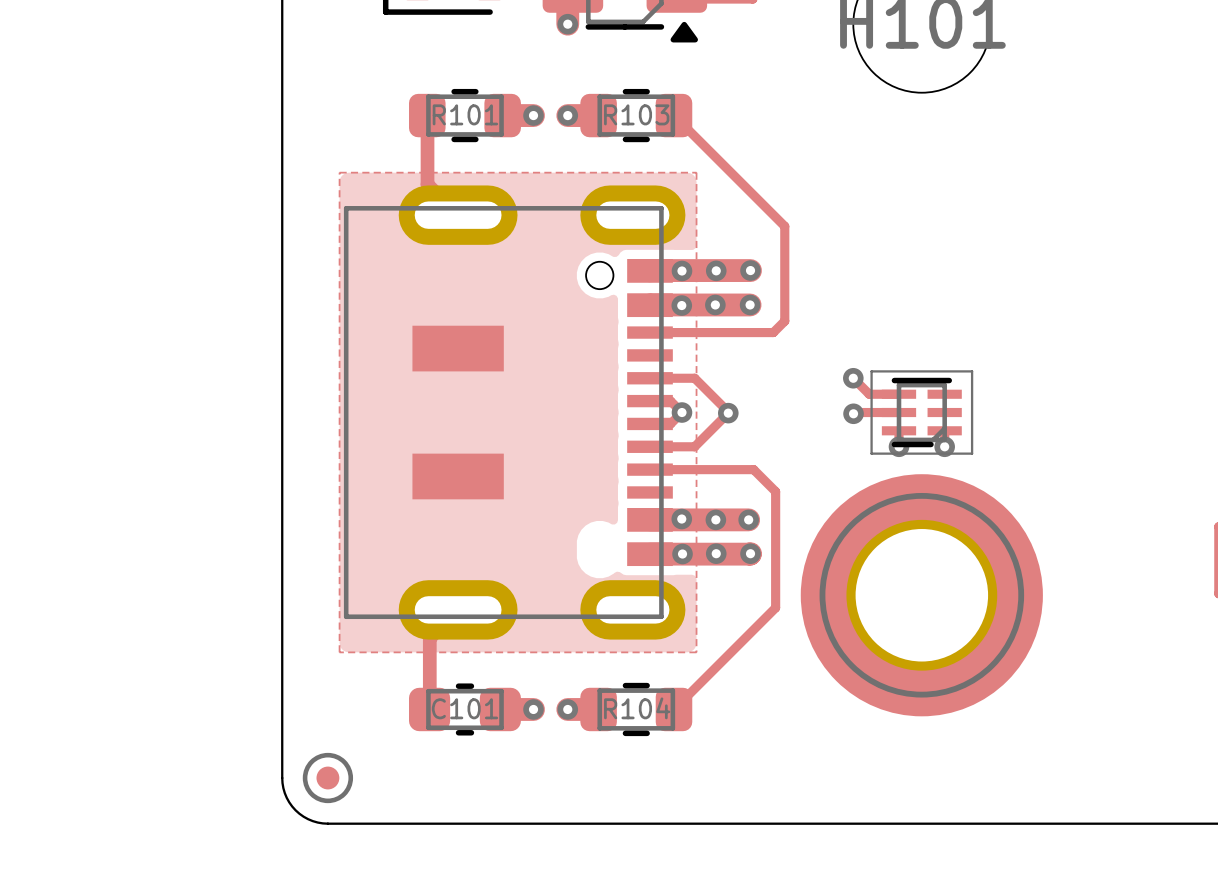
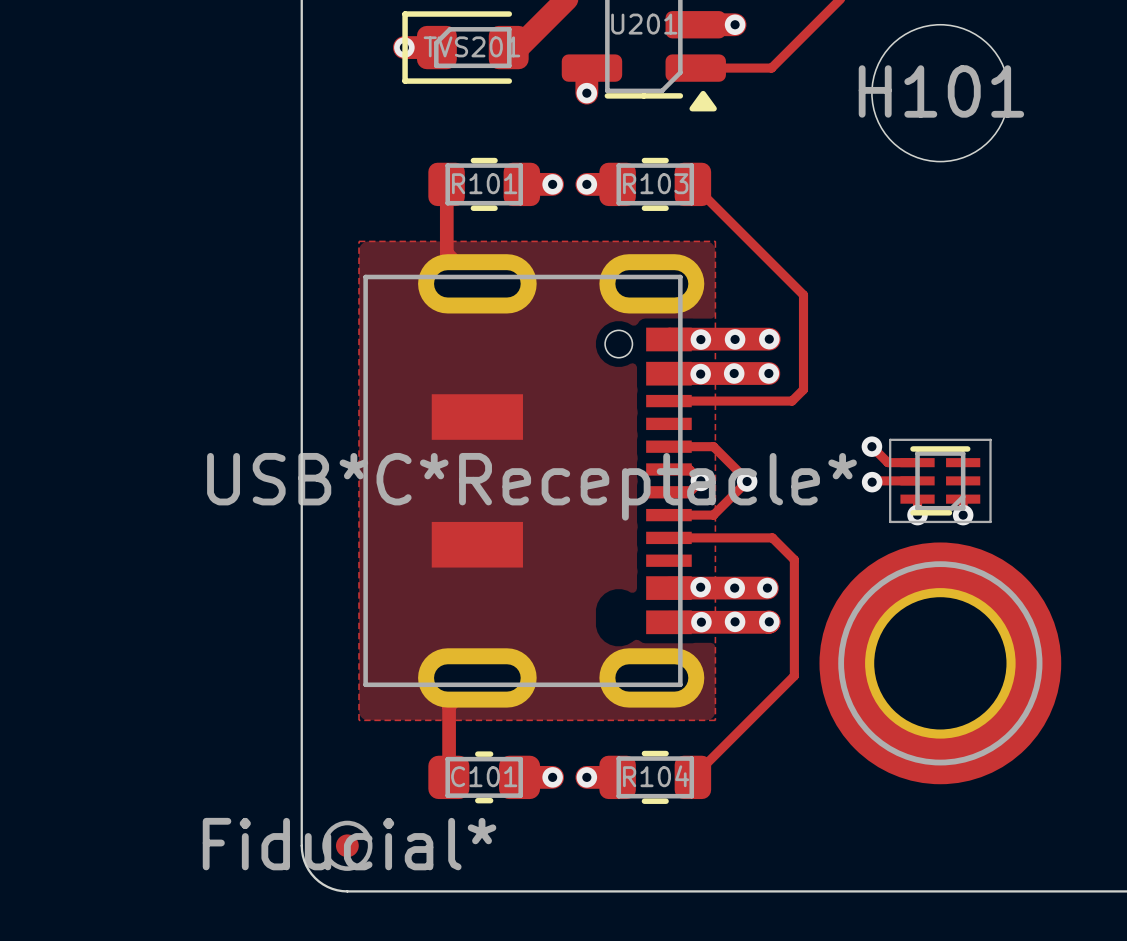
part text: none -> USB*C*Receptacle* (531, 486)
part text: none -> Fiducial* (349, 844)

